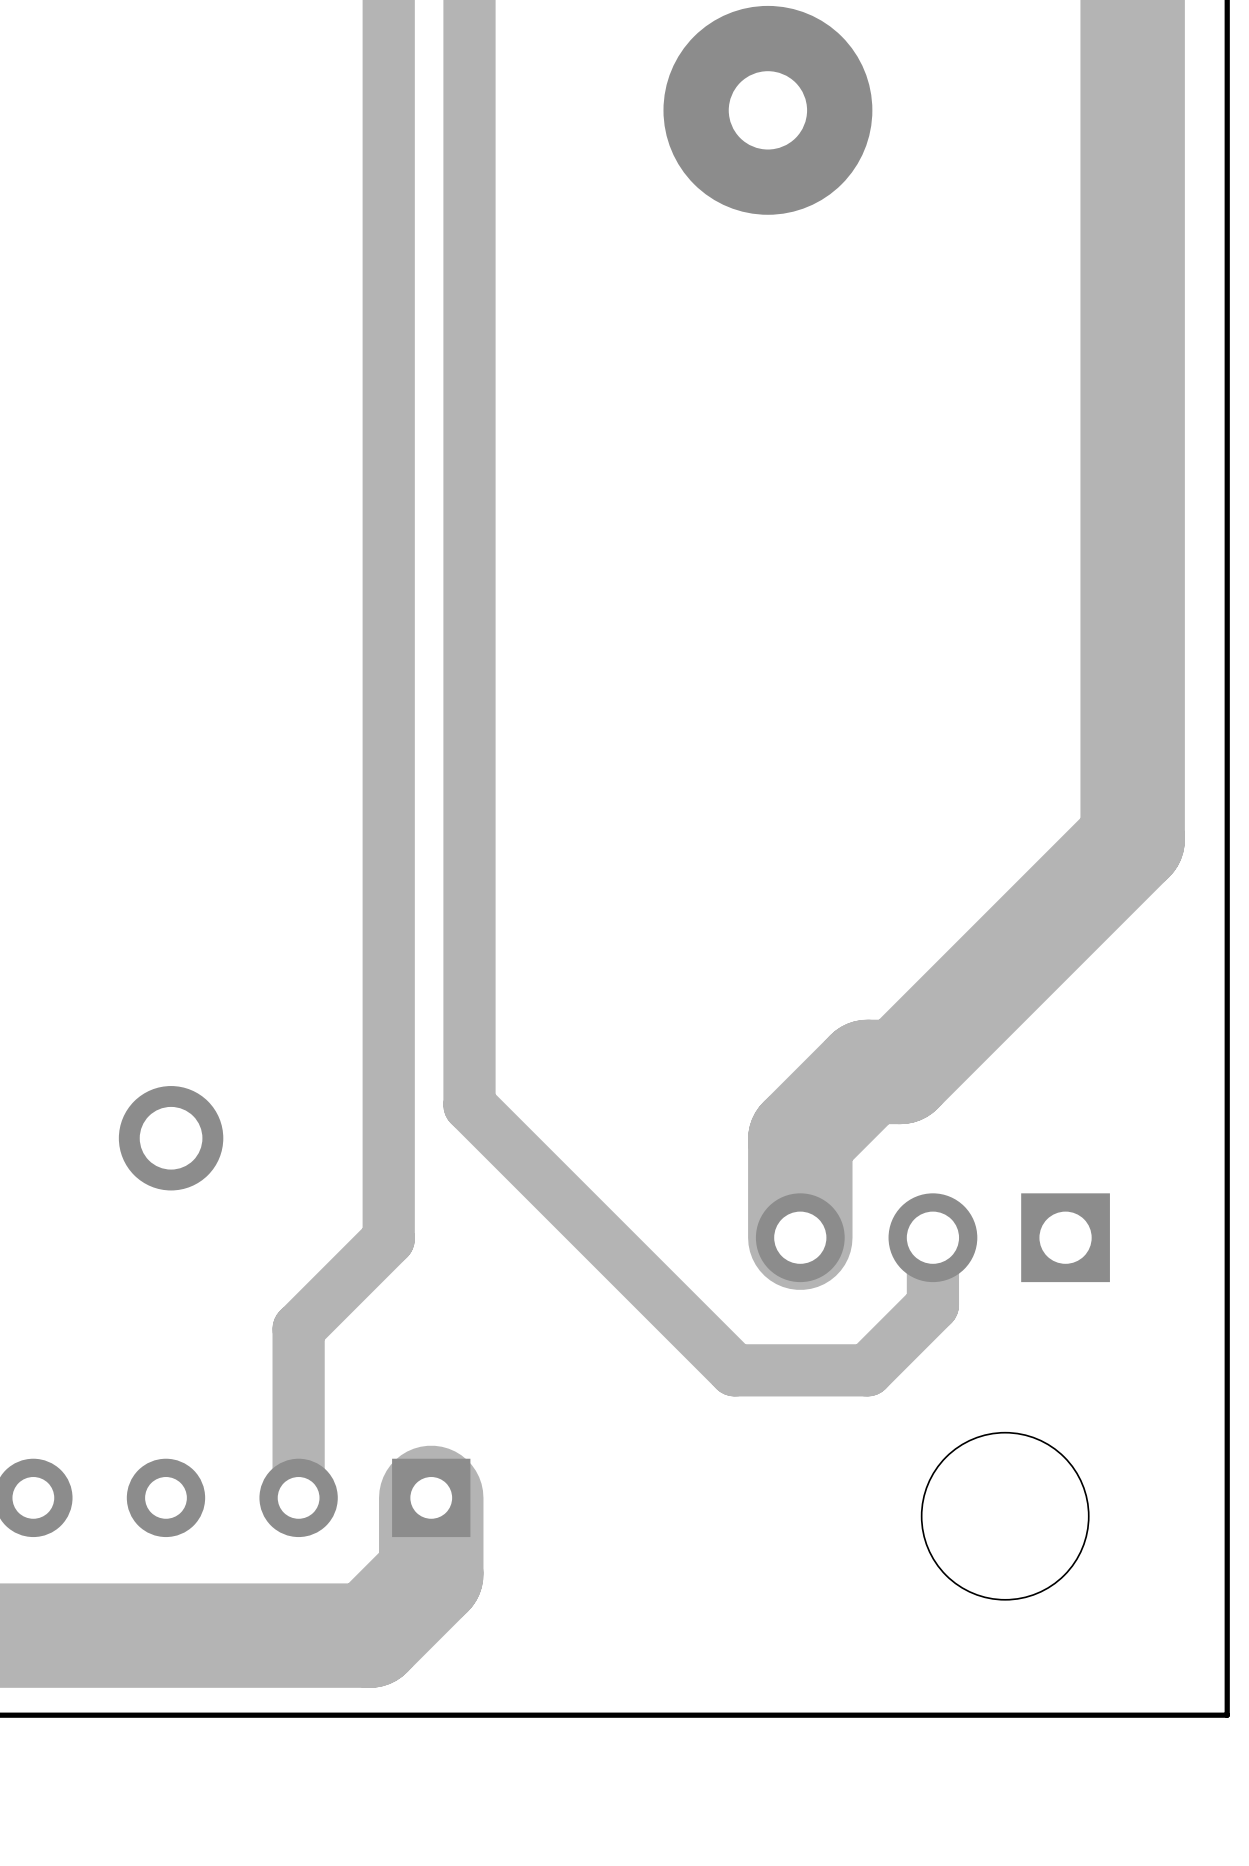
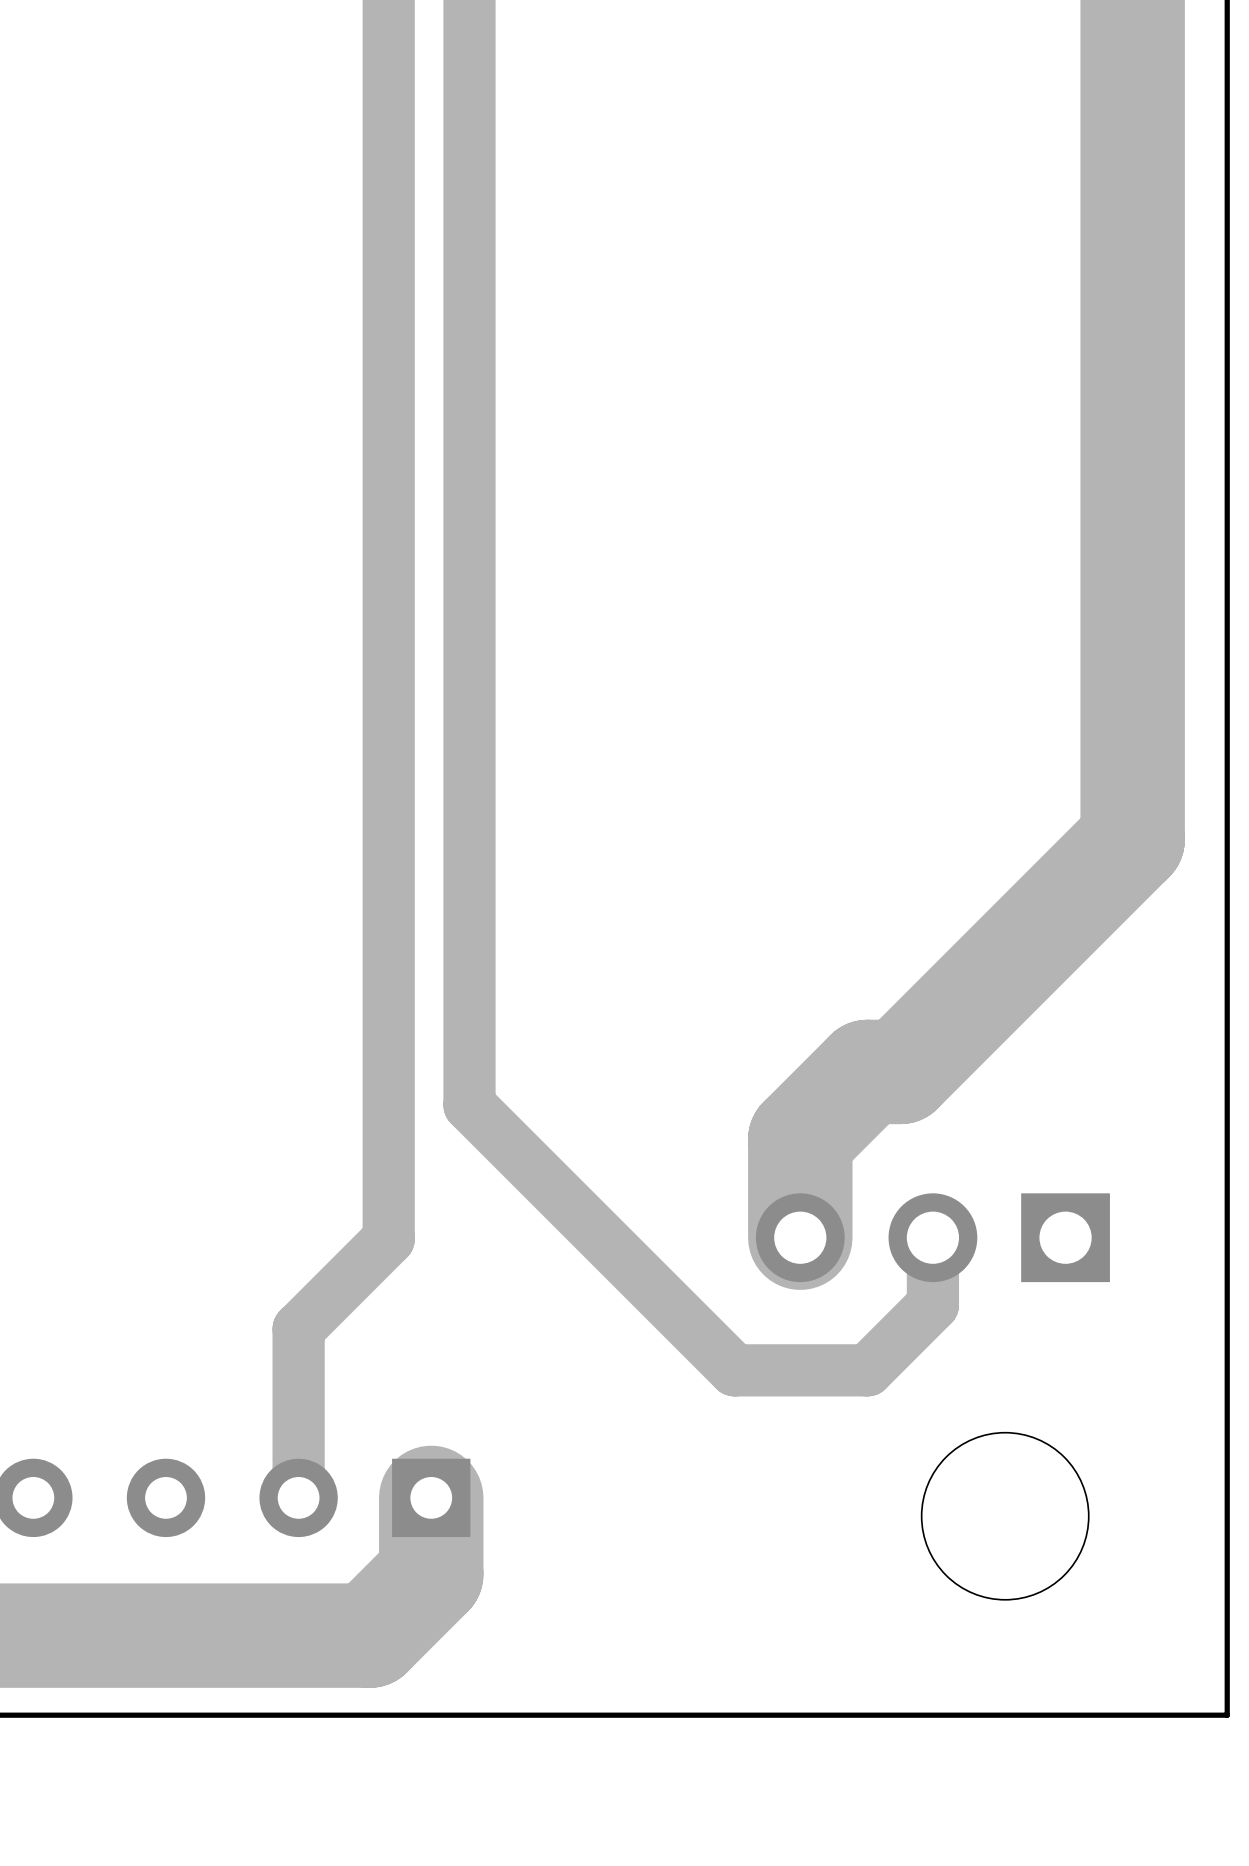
via: (767, 110) -> none
via: (171, 1138) -> none

